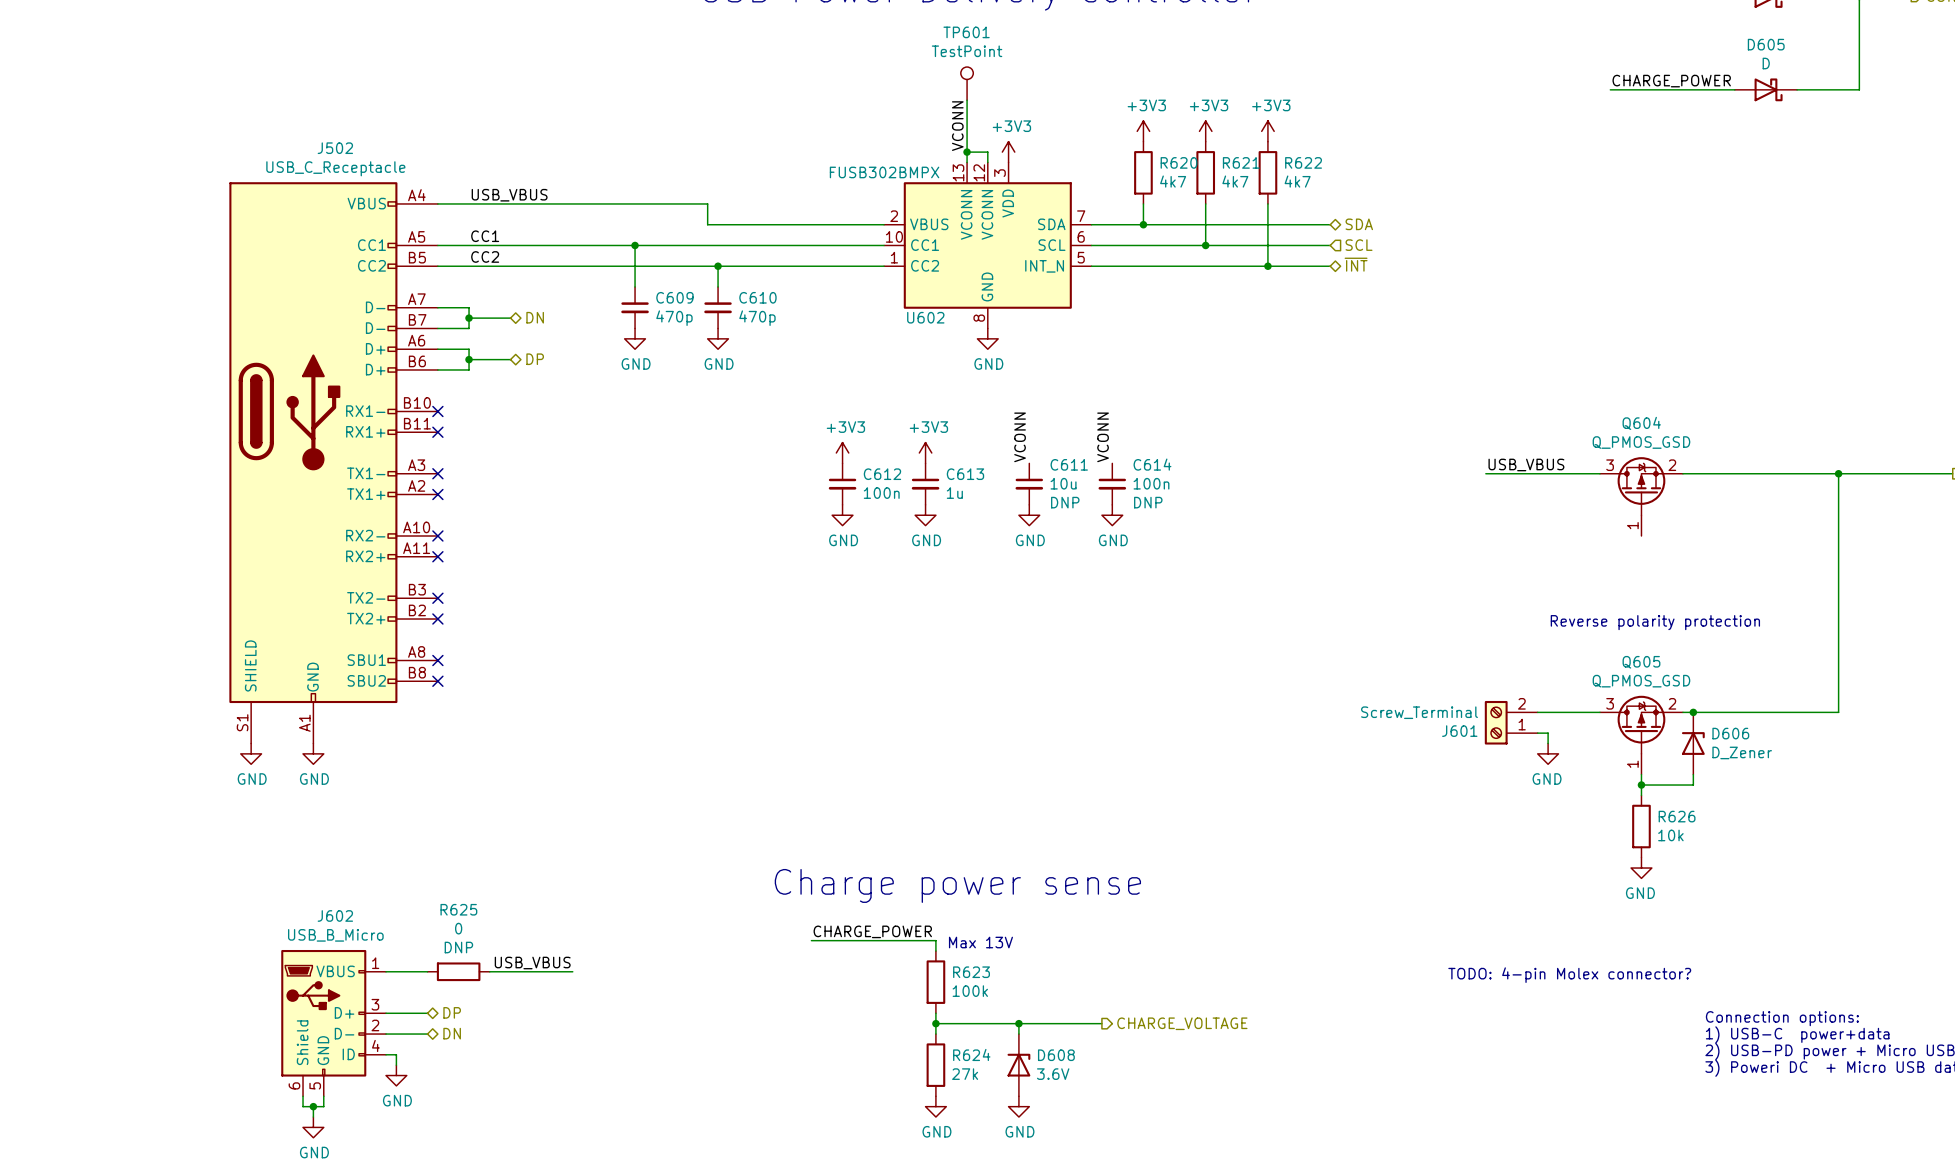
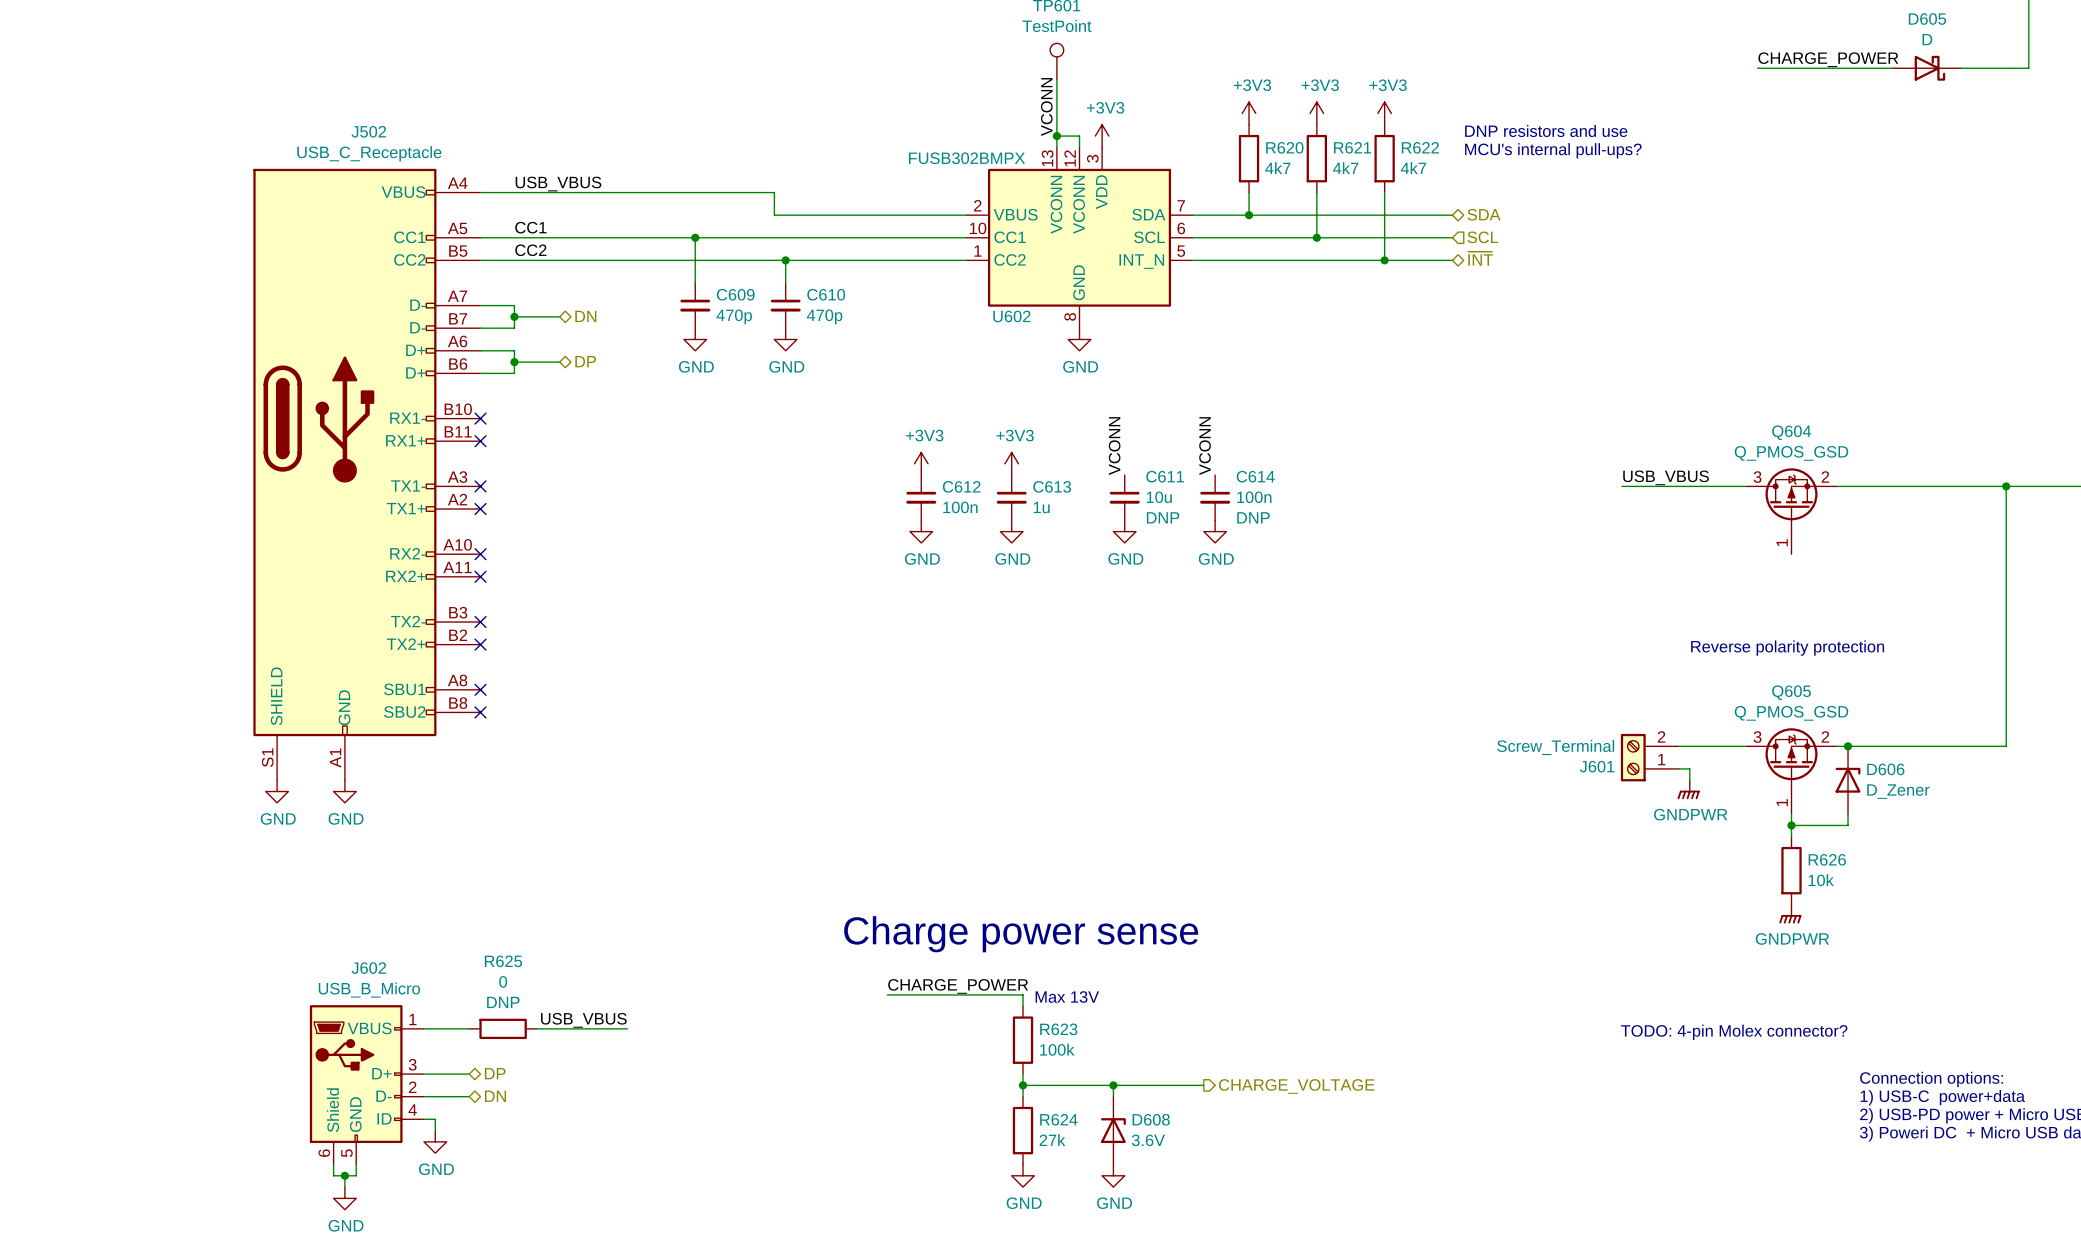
text: none -> DNP resistors and use (1546, 130)
text: none -> MCU's internal pull-ups? (1553, 150)
power symbol: GND (1548, 753) -> GNDPWR (1688, 789)
power symbol: GND (1641, 868) -> GNDPWR (1790, 914)

